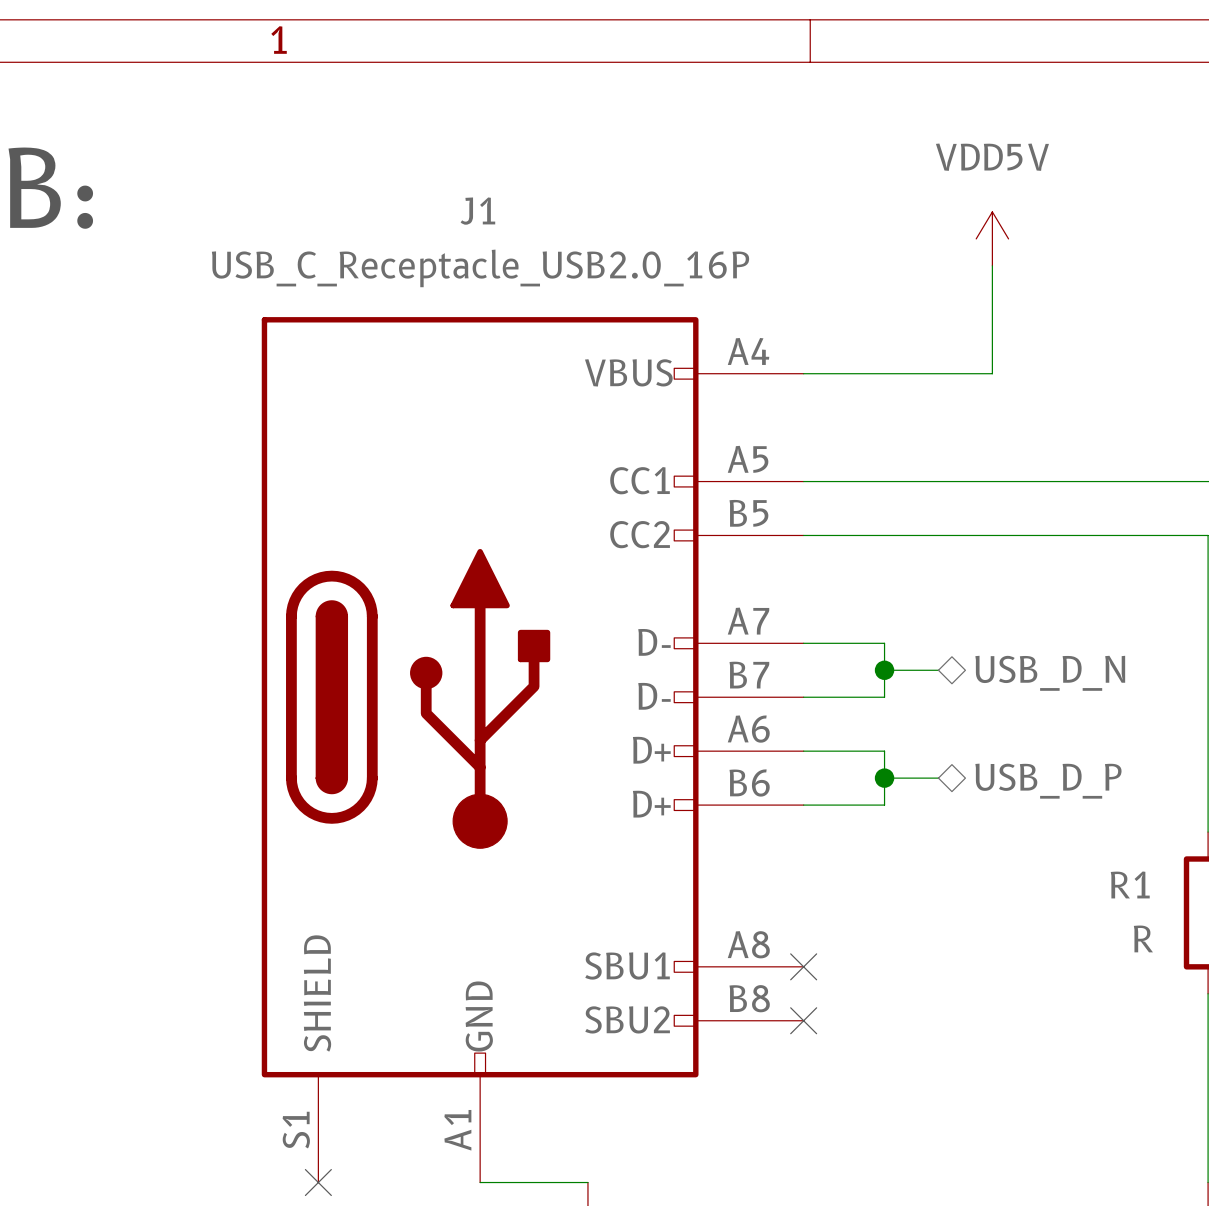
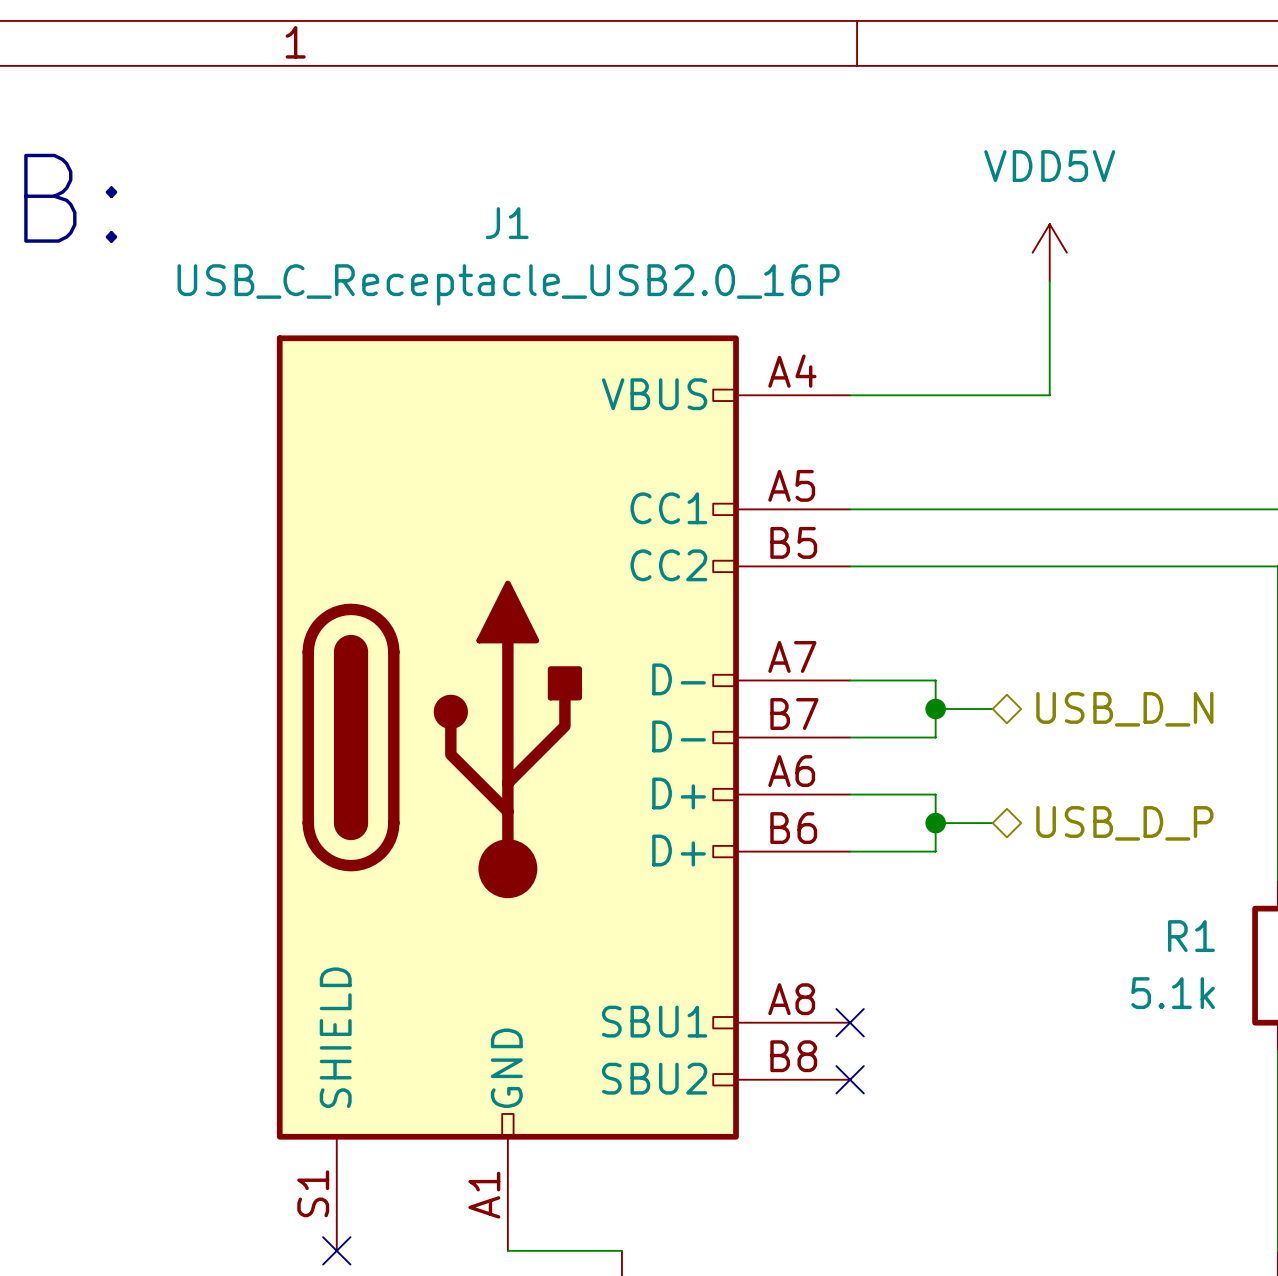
R1 value: R (1143, 938) -> 5.1k (1173, 993)

